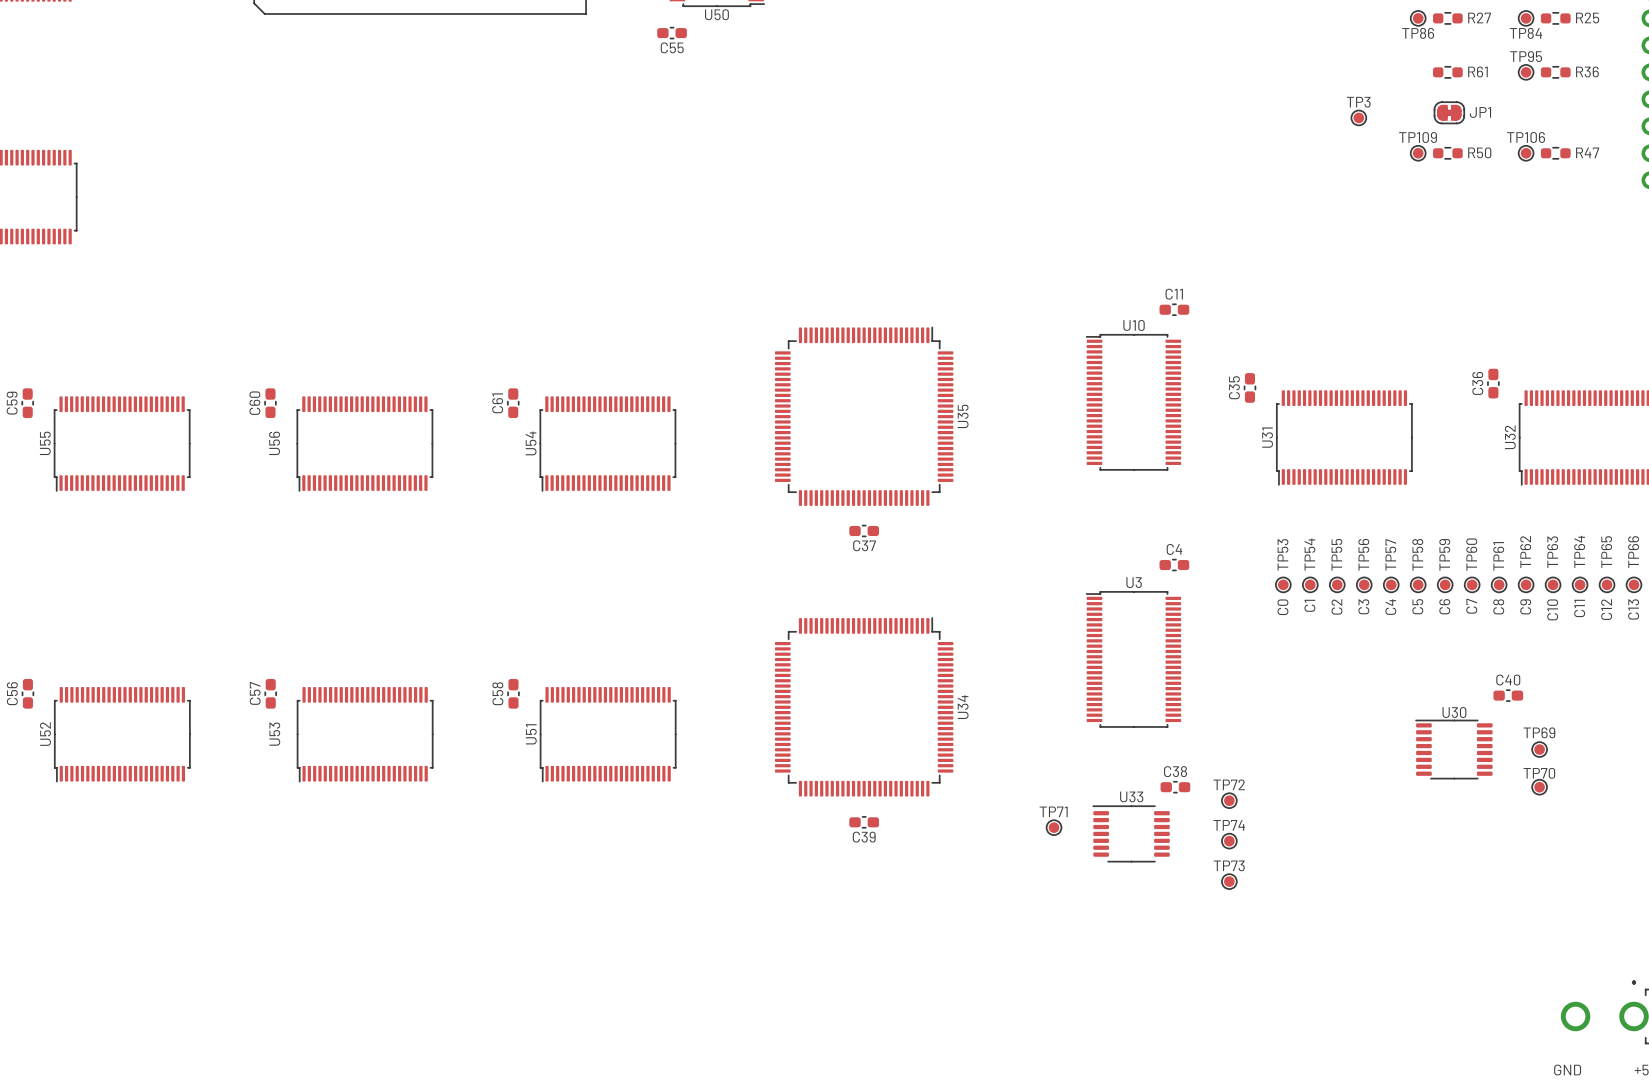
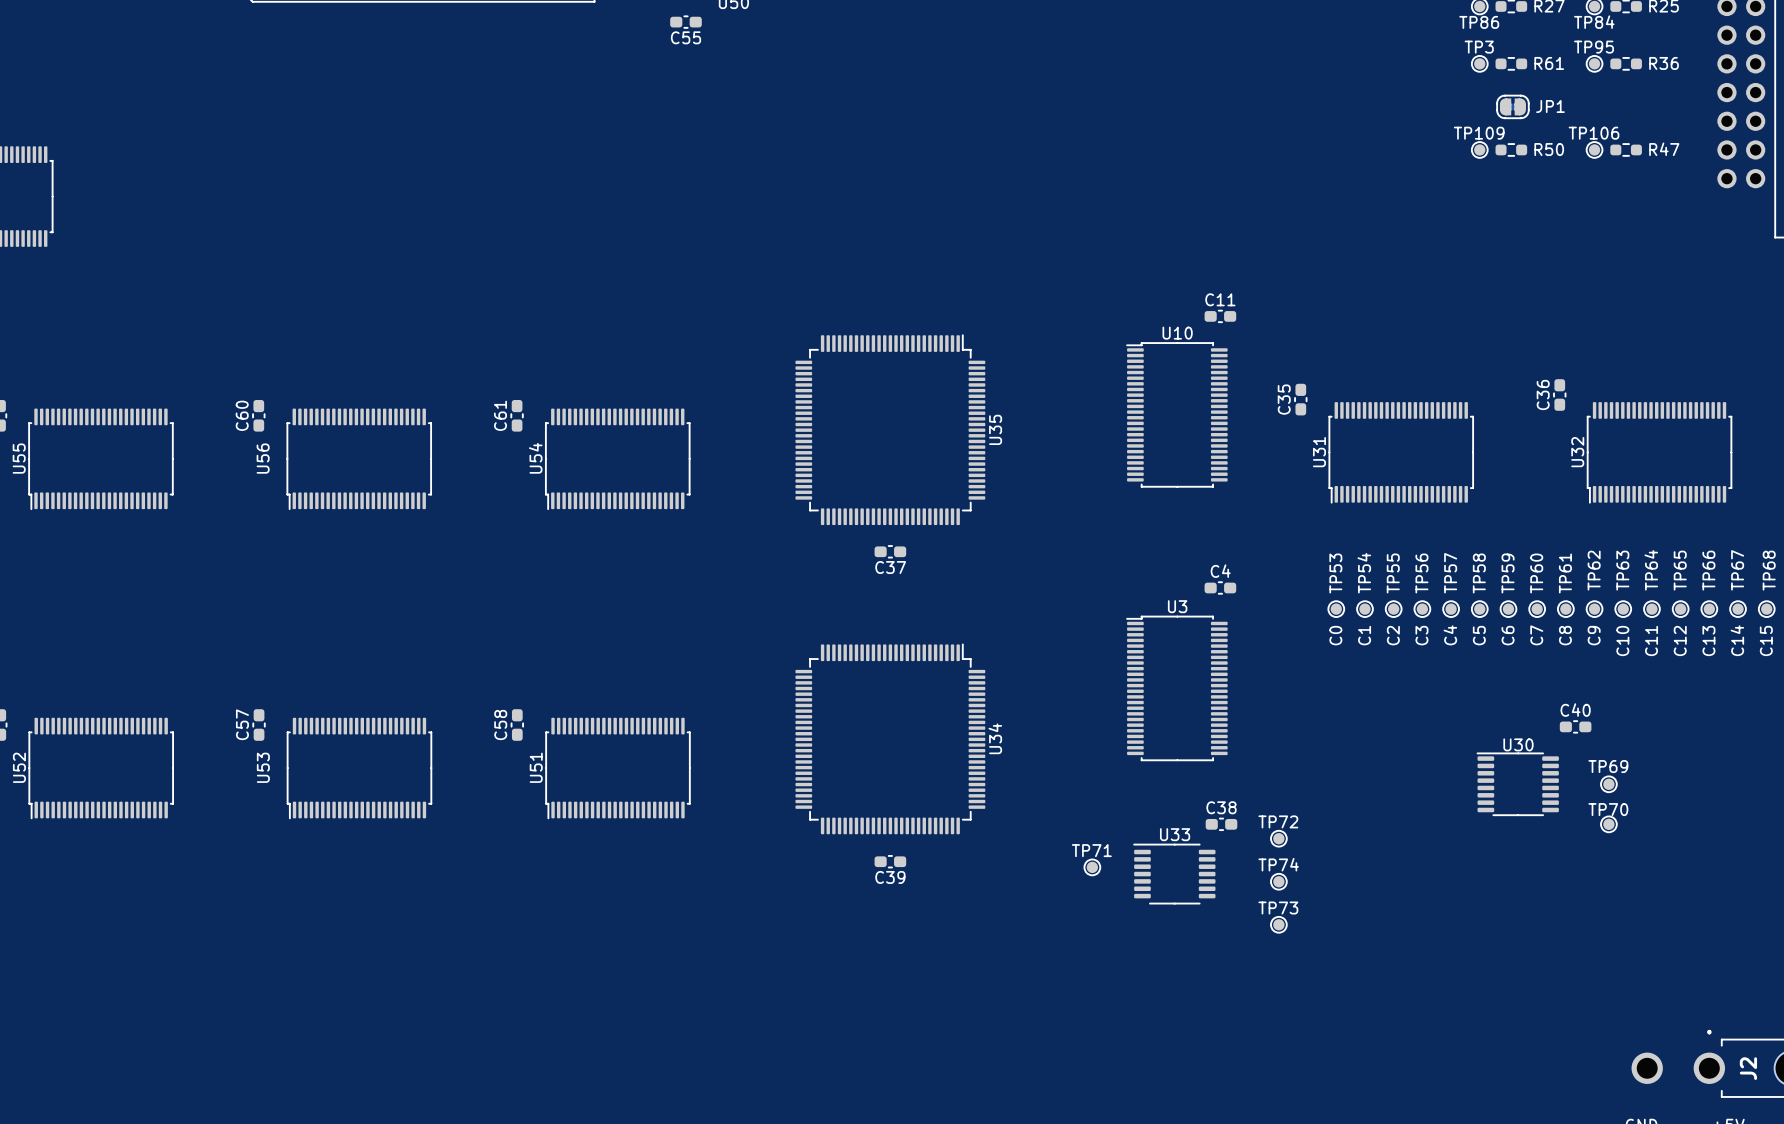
TP3 position: (1358, 117) -> (1479, 63)

